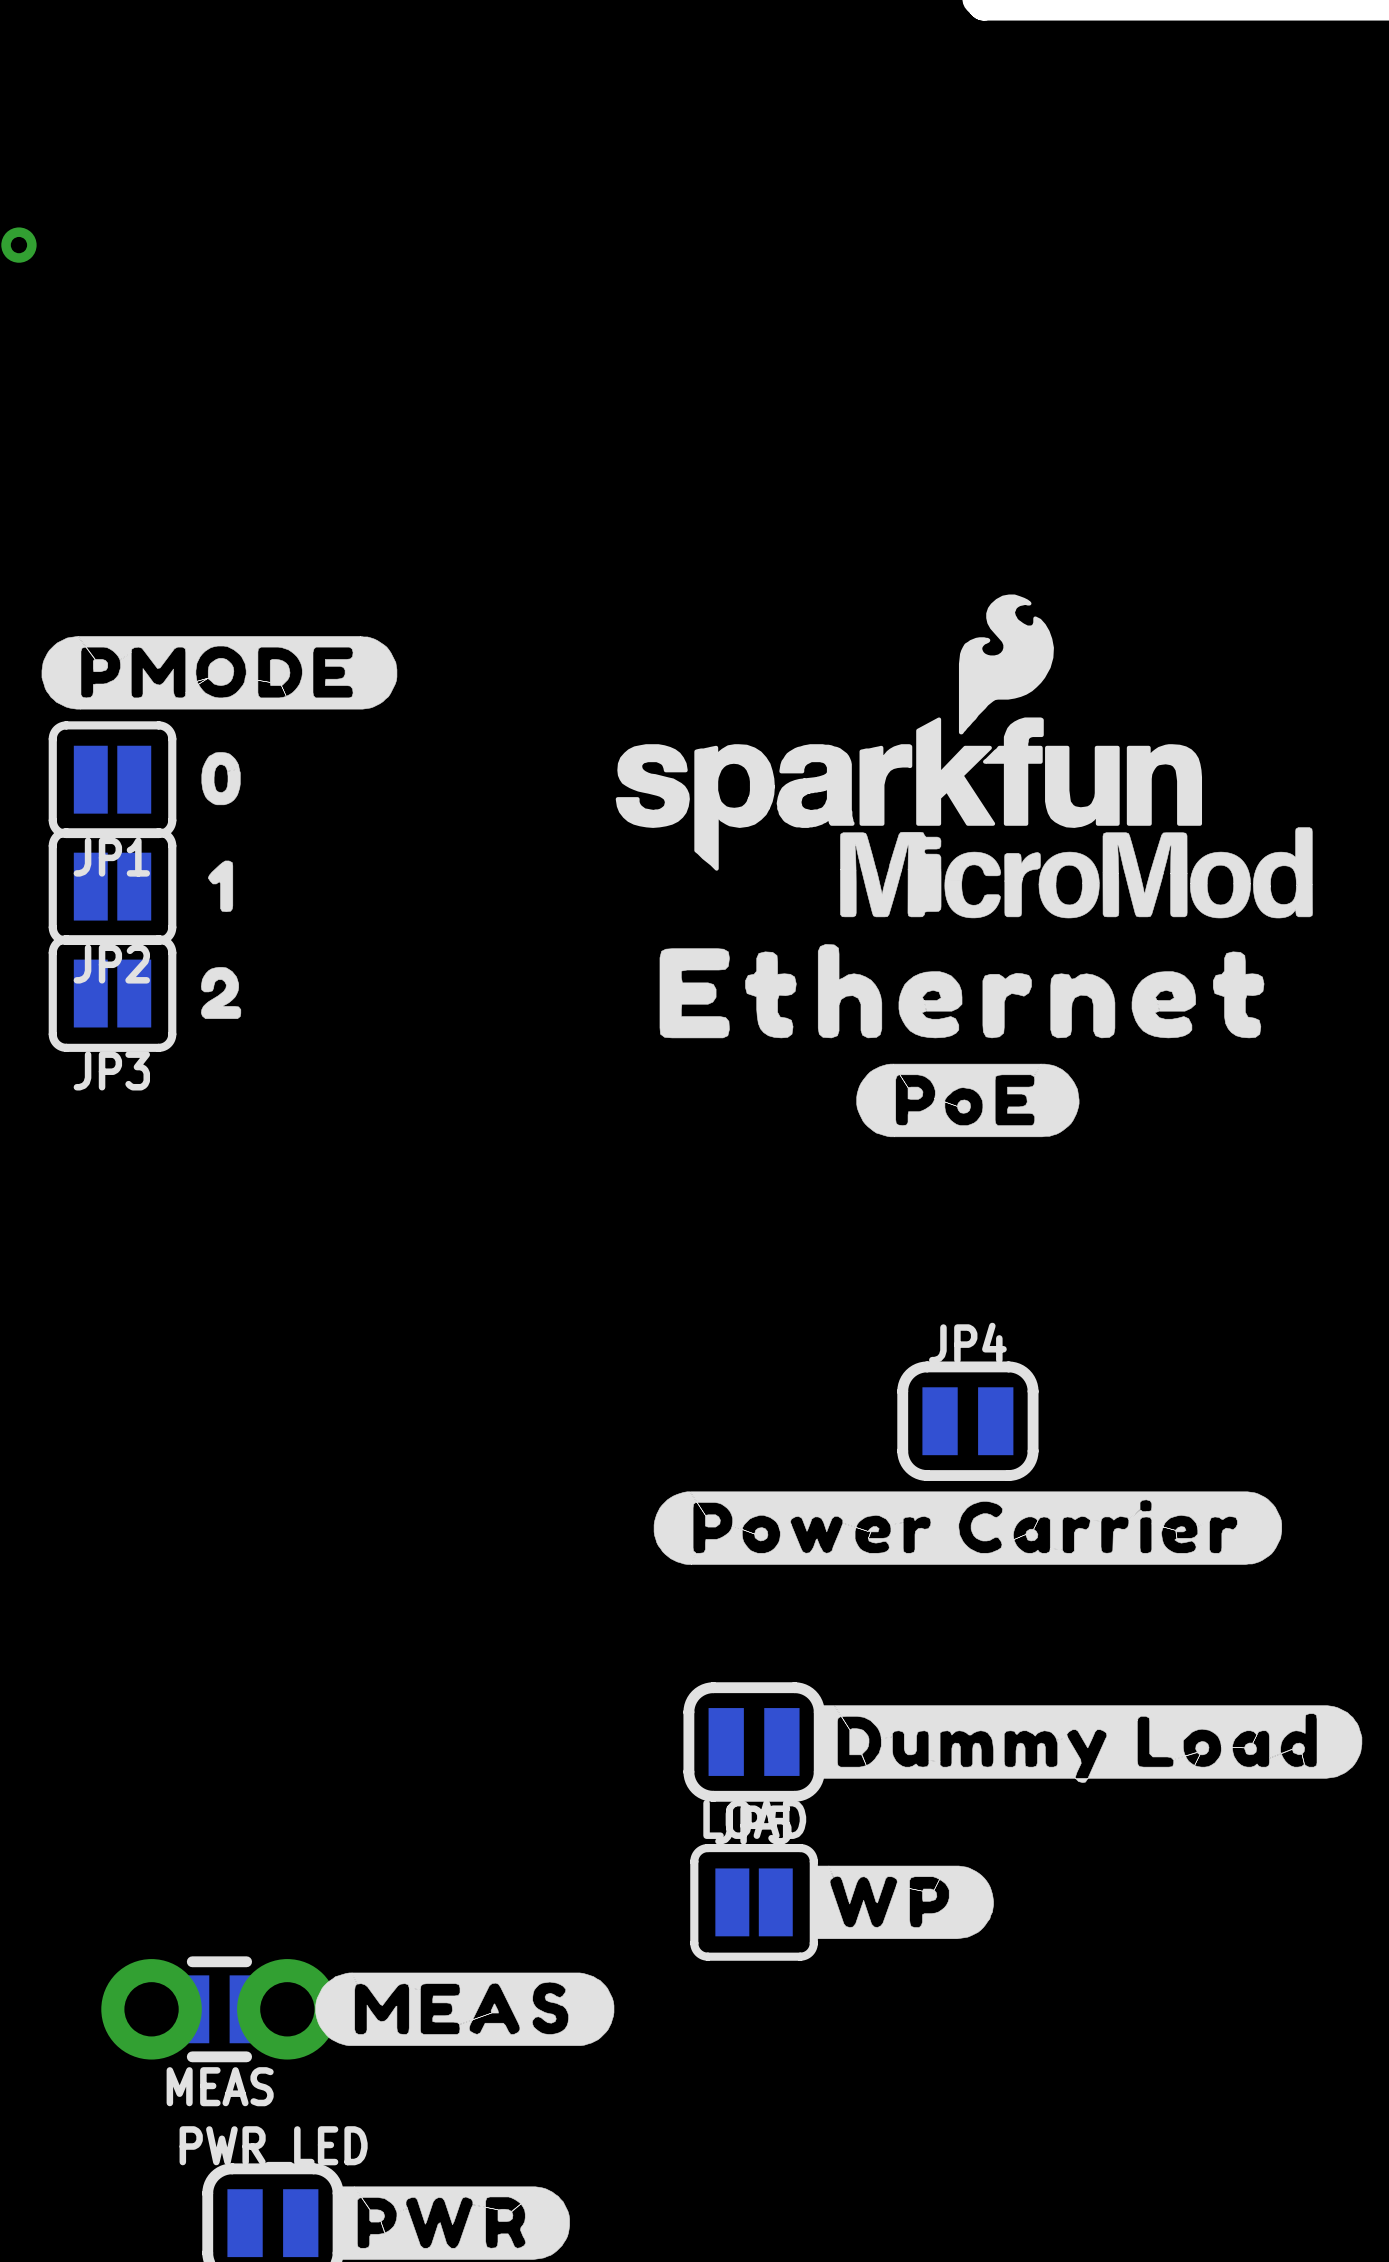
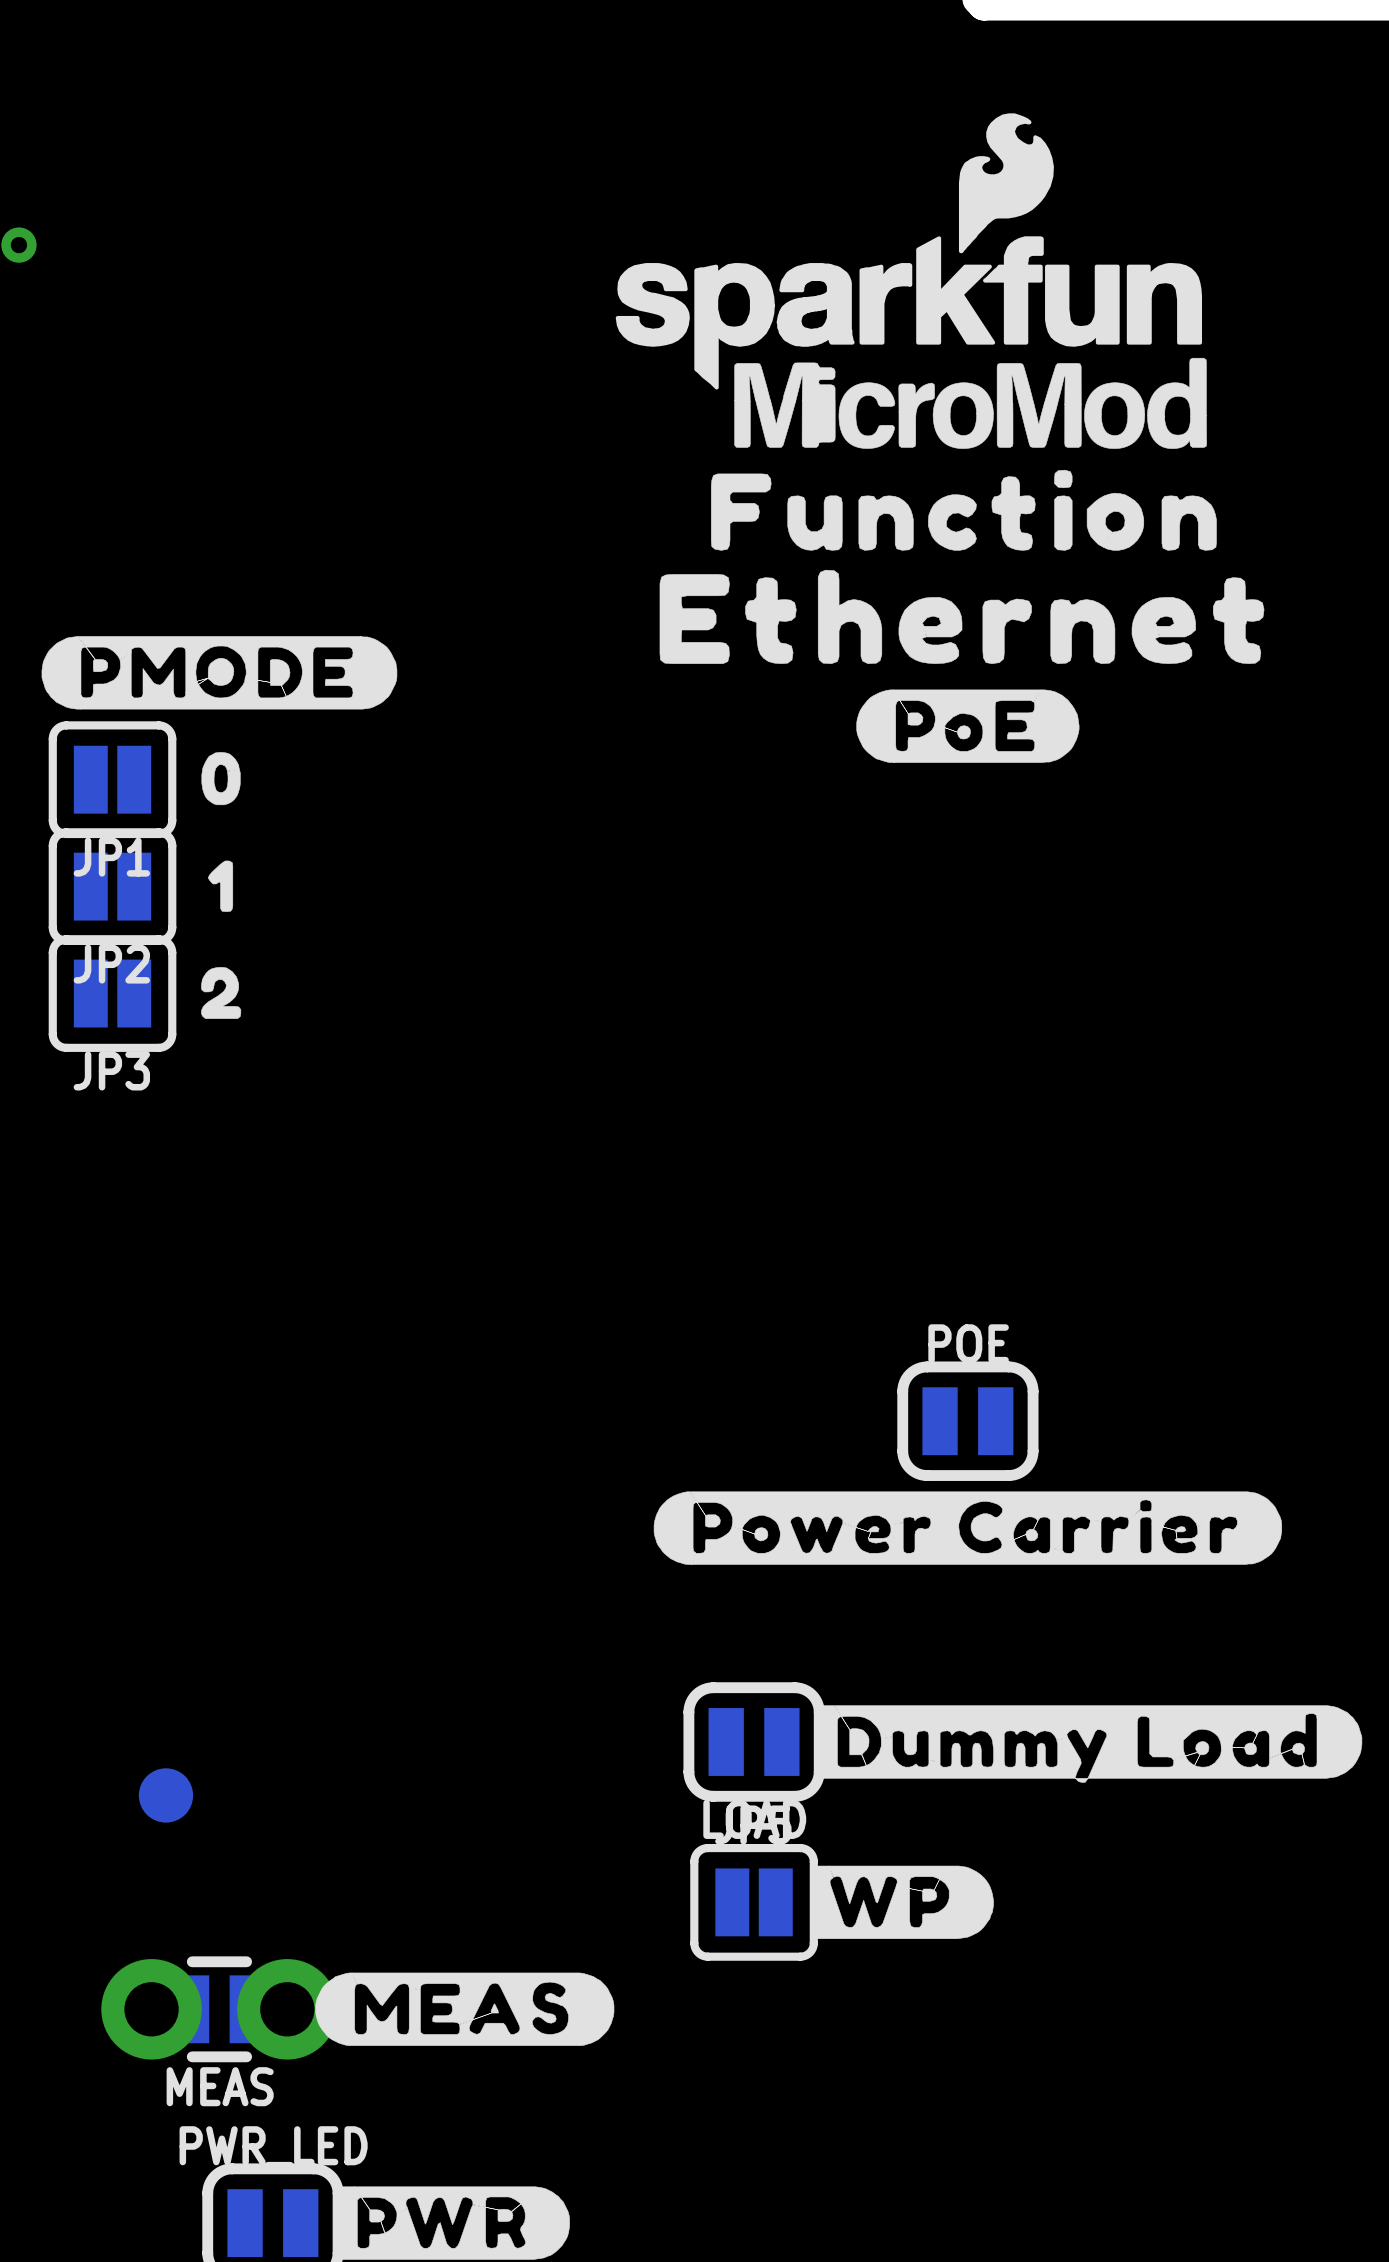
drawing: none -> [711, 469, 1217, 551]
drawing position: (908, 732) -> (908, 251)
drawing position: (1076, 872) -> (970, 403)
drawing position: (962, 991) -> (962, 616)
drawing position: (967, 1100) -> (967, 726)
JP4 name: JP4 (967, 1343) -> POE (968, 1343)
part: none -> (165, 1795)

